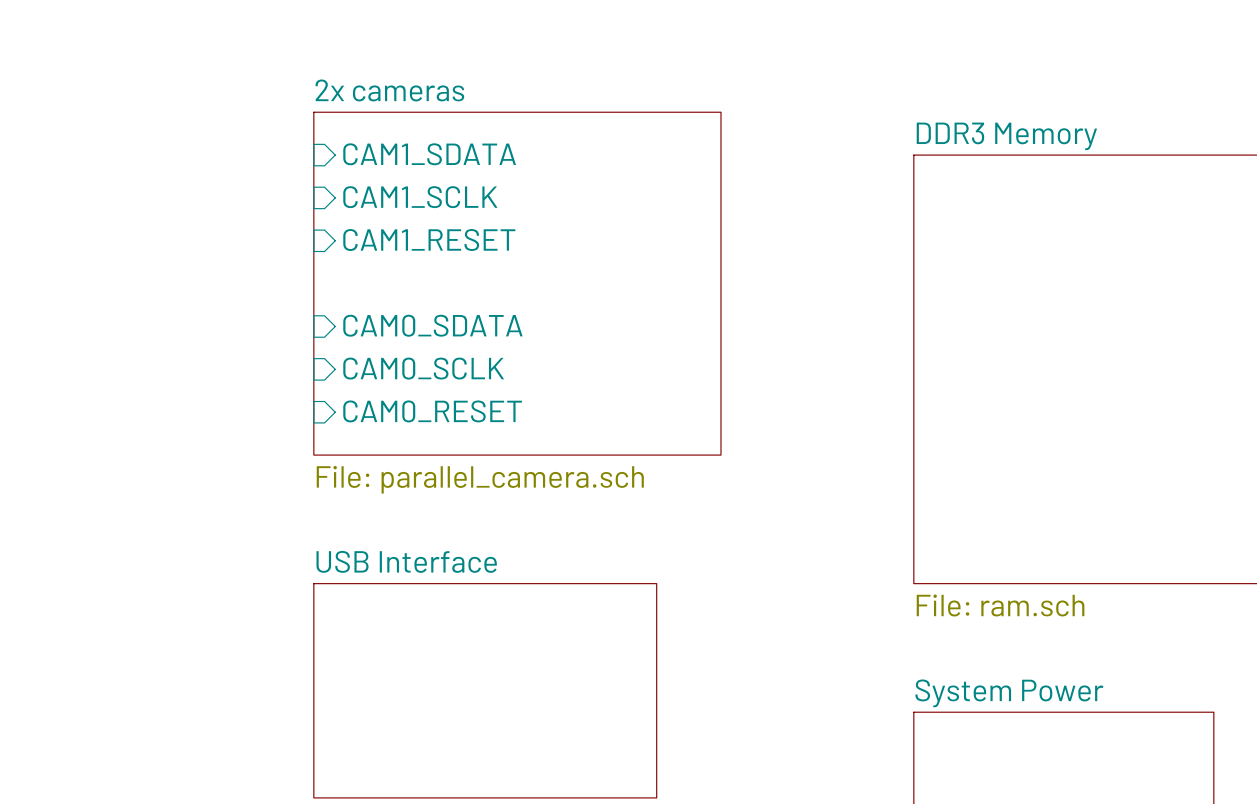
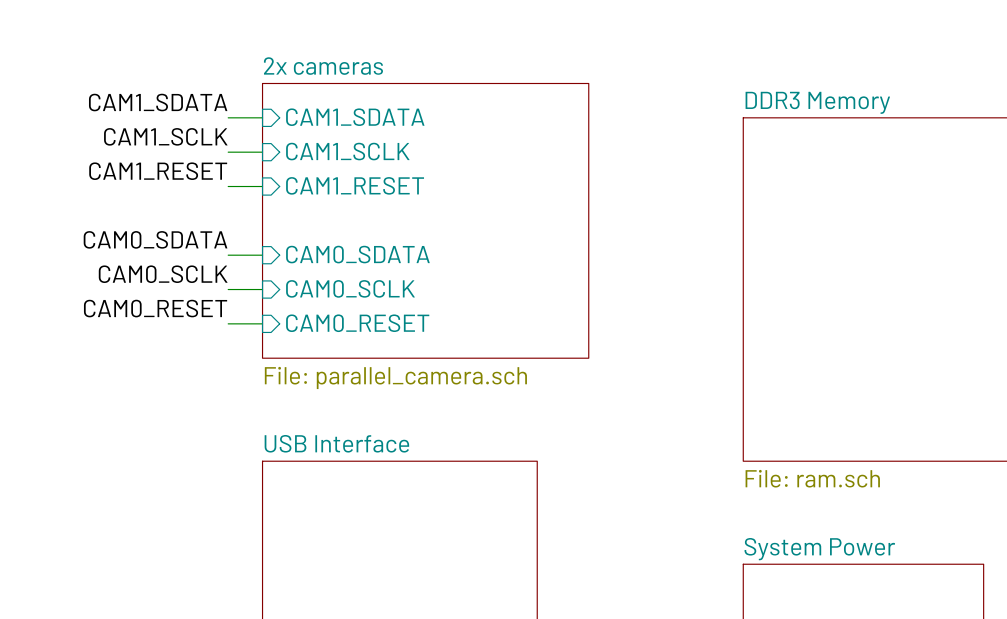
label: none -> CAM1_SDATA (158, 102)
wire: none -> (228, 117) (262, 117)
label: none -> CAM1_SCLK (165, 136)
wire: none -> (228, 152) (262, 152)
label: none -> CAM1_RESET (158, 171)
wire: none -> (228, 186) (262, 186)
label: none -> CAM0_SDATA (155, 239)
wire: none -> (228, 255) (262, 255)
label: none -> CAM0_SCLK (163, 274)
wire: none -> (228, 289) (262, 289)
label: none -> CAM0_RESET (155, 308)
wire: none -> (228, 323) (262, 323)

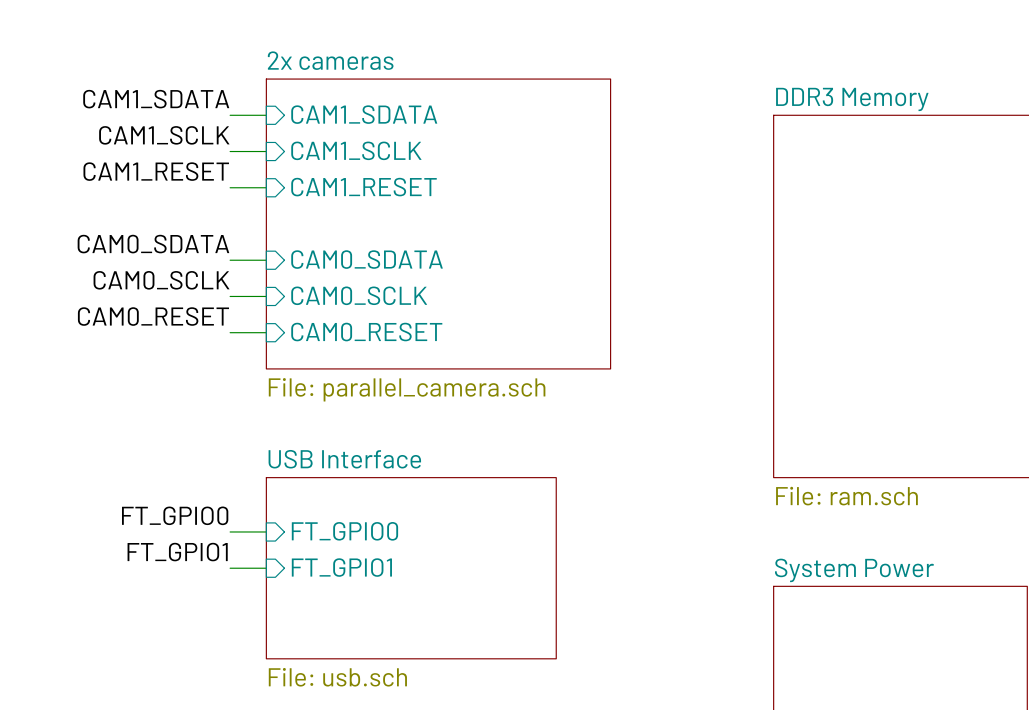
label: none -> FT_GPIO0 (175, 515)
wire: none -> (230, 531) (266, 531)
sheet pin: none -> FT_GPIO0 (344, 531)
label: none -> FT_GPIO1 (177, 552)
sheet pin: none -> FT_GPIO1 (341, 567)
wire: none -> (230, 568) (266, 568)

